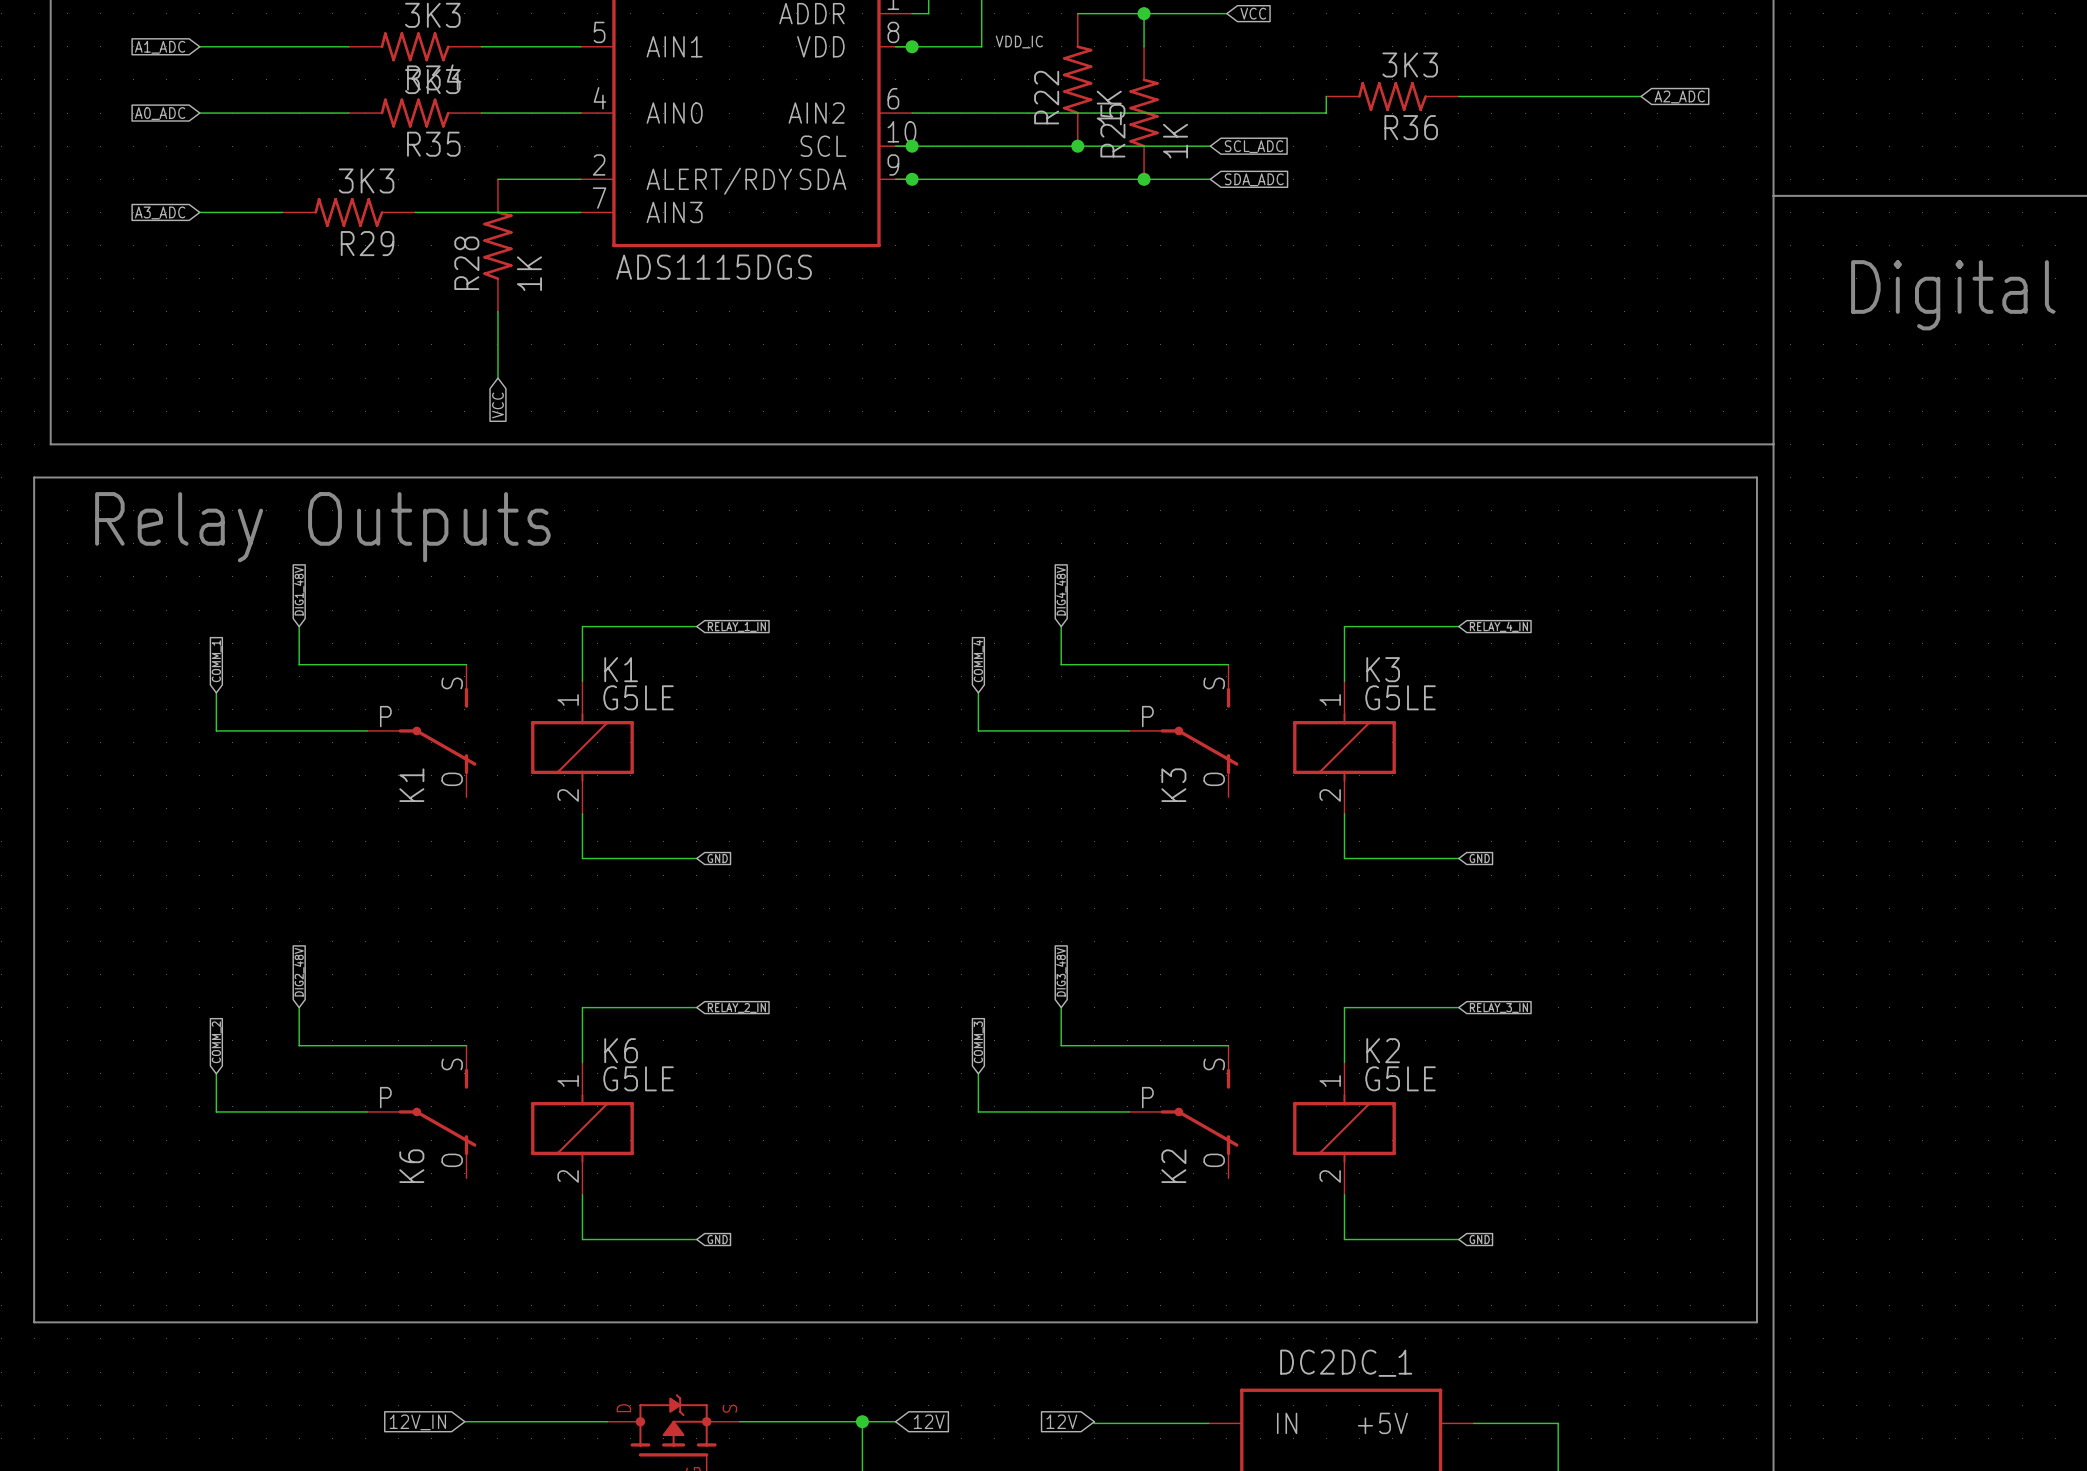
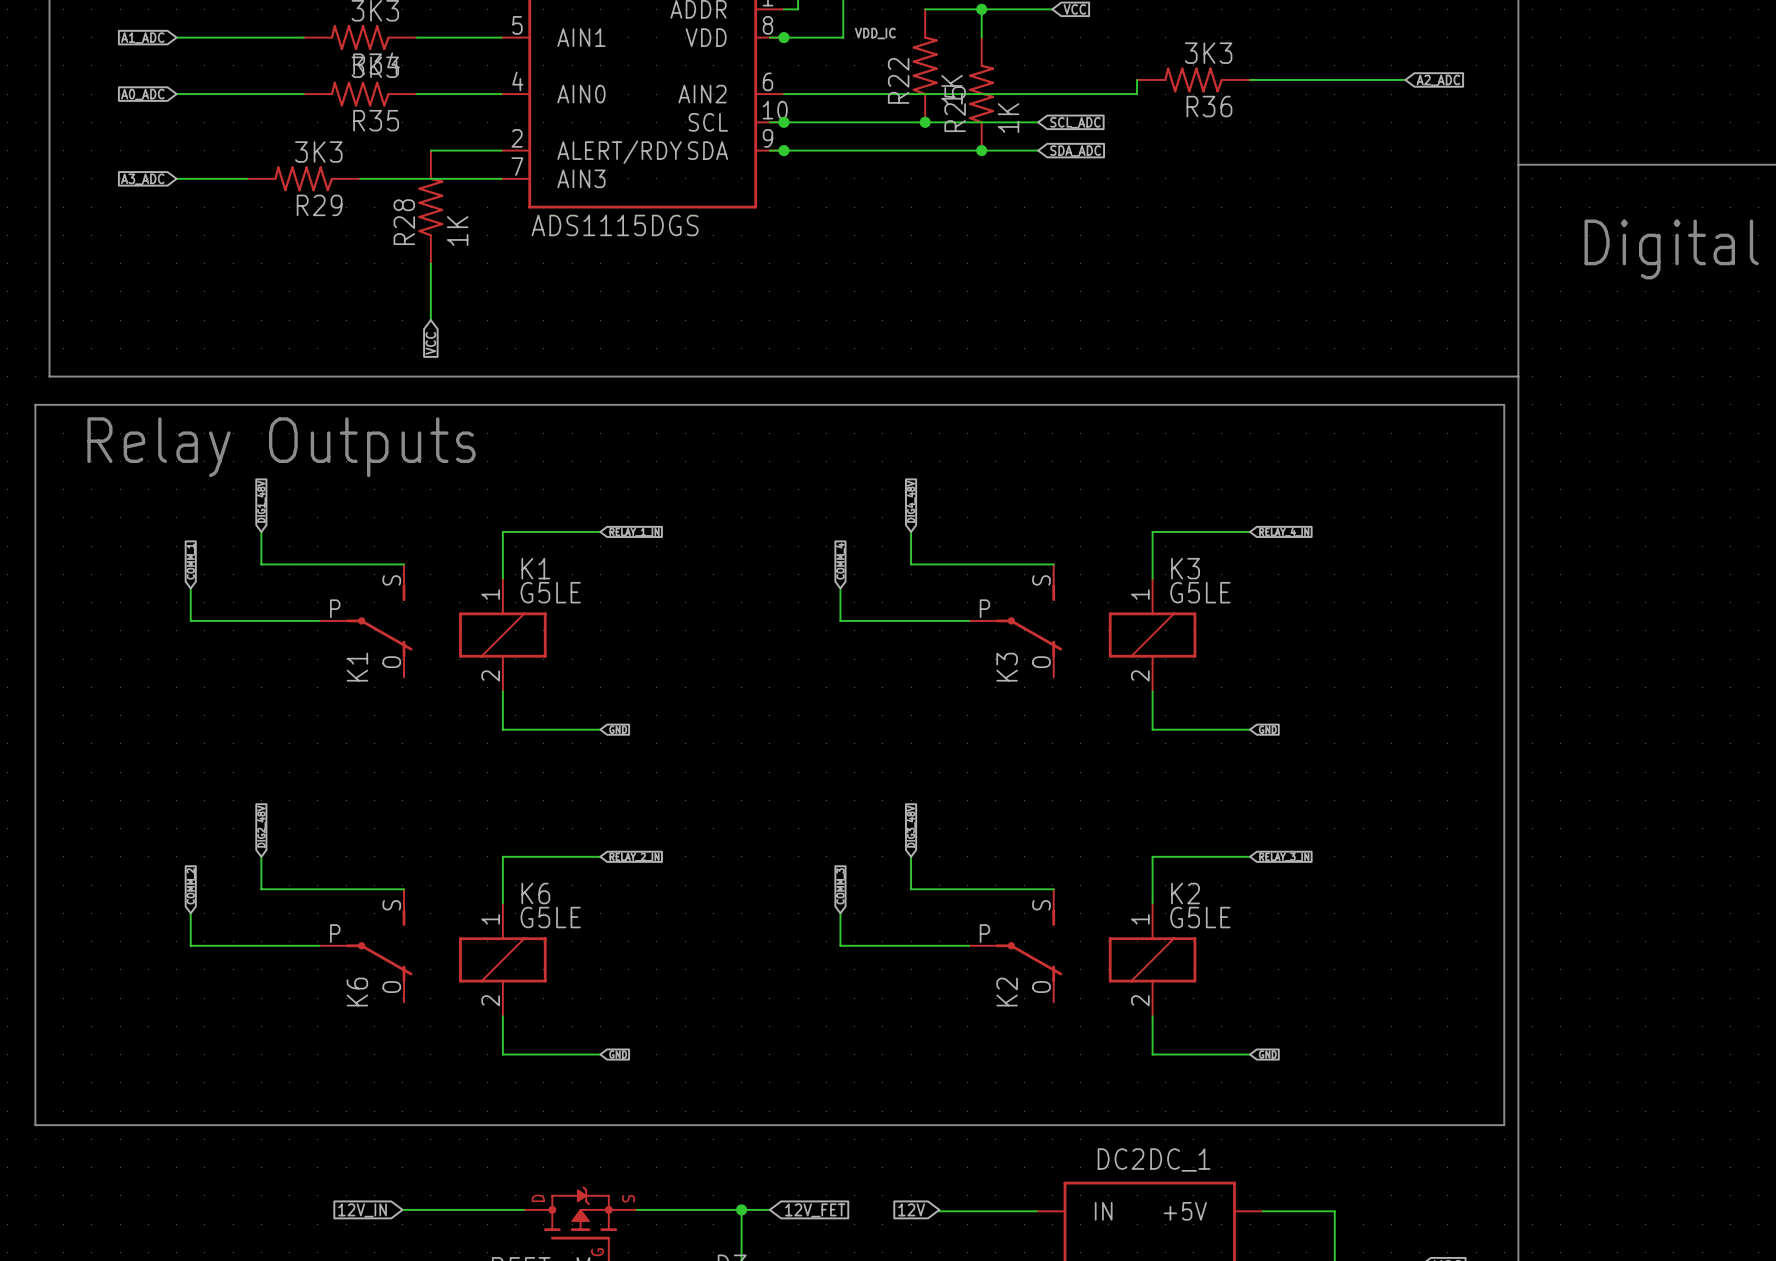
global label: 12V (929, 1421) -> 12V_FET (815, 1210)

